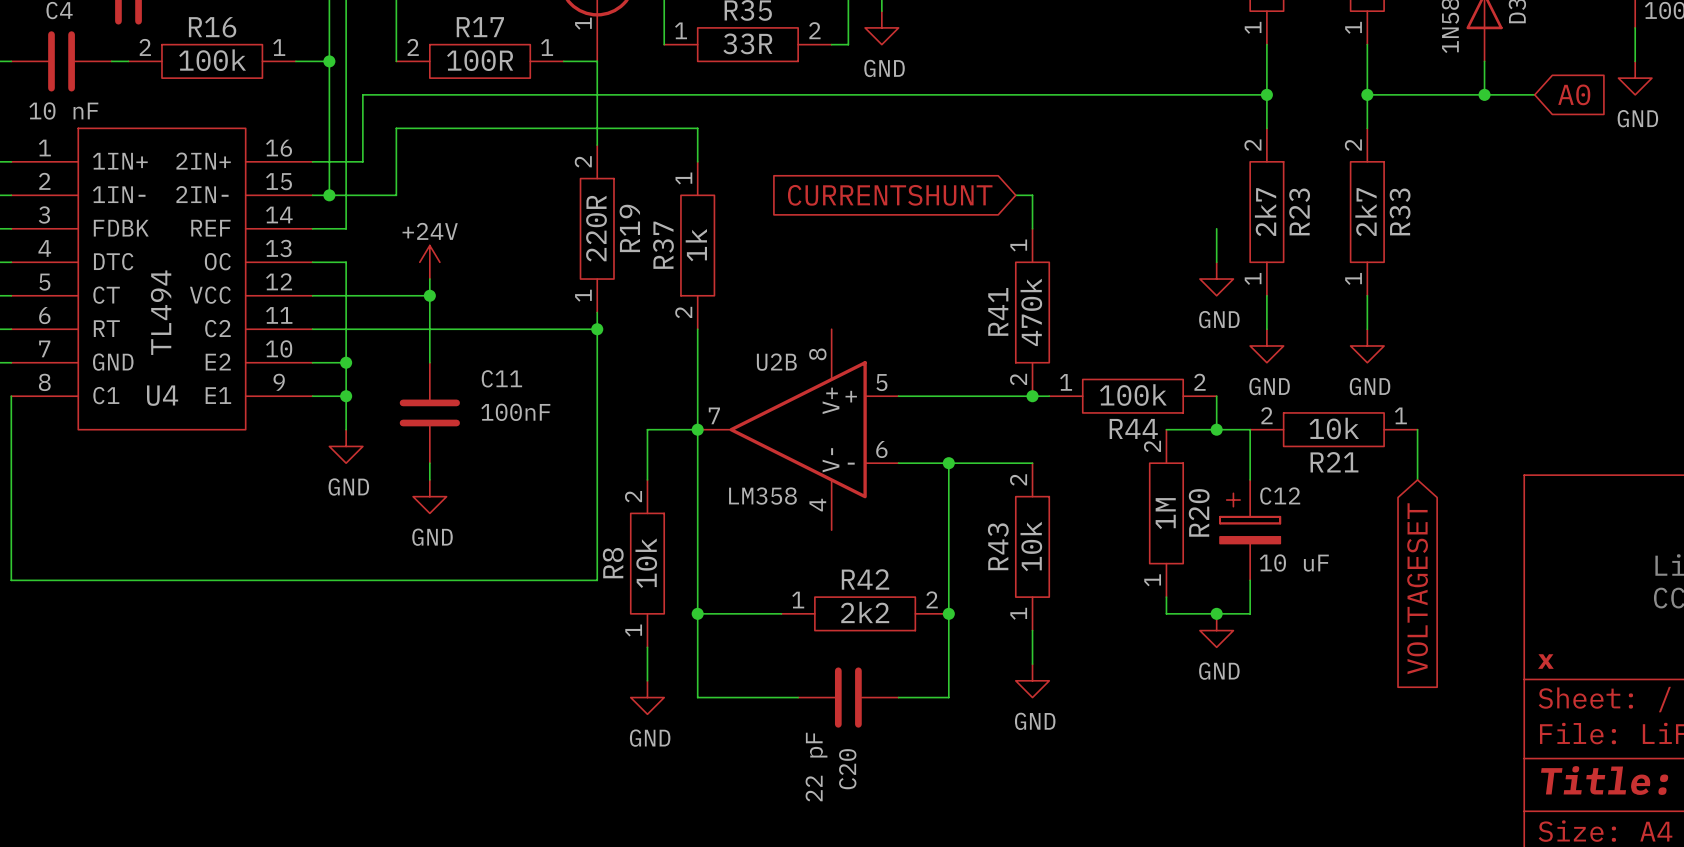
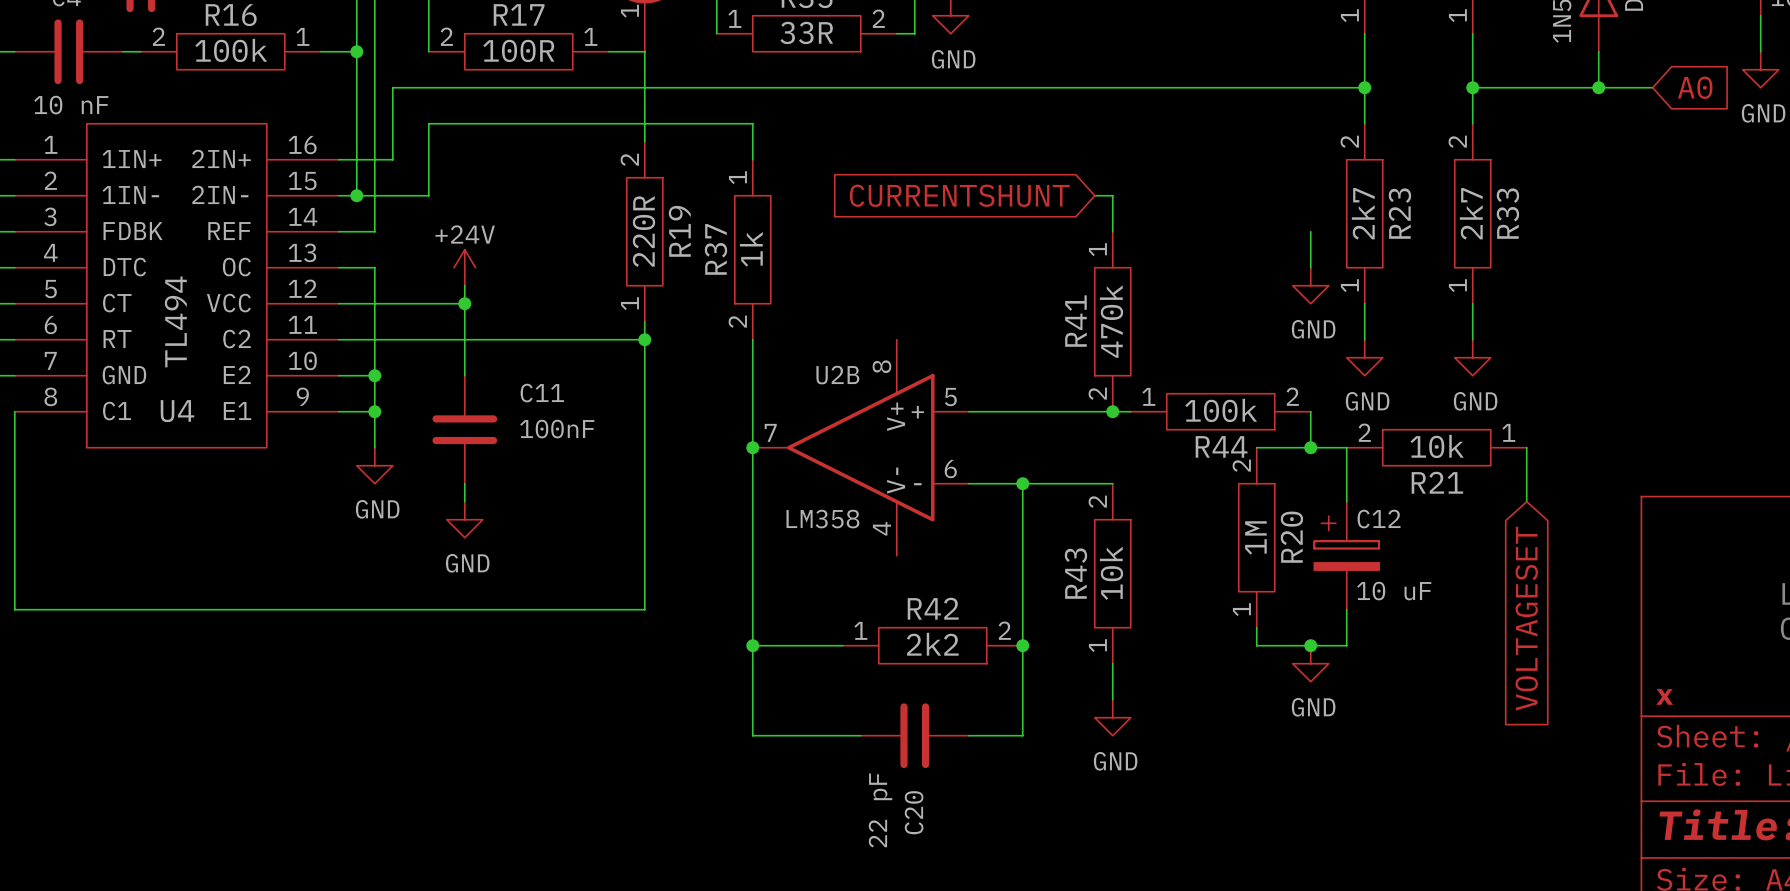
wire: (697, 429) (647, 429) (647, 479) -> none
R8: 10k (647, 563) -> none
wire: (647, 647) (647, 680) -> none
power symbol: GND (647, 697) -> none

